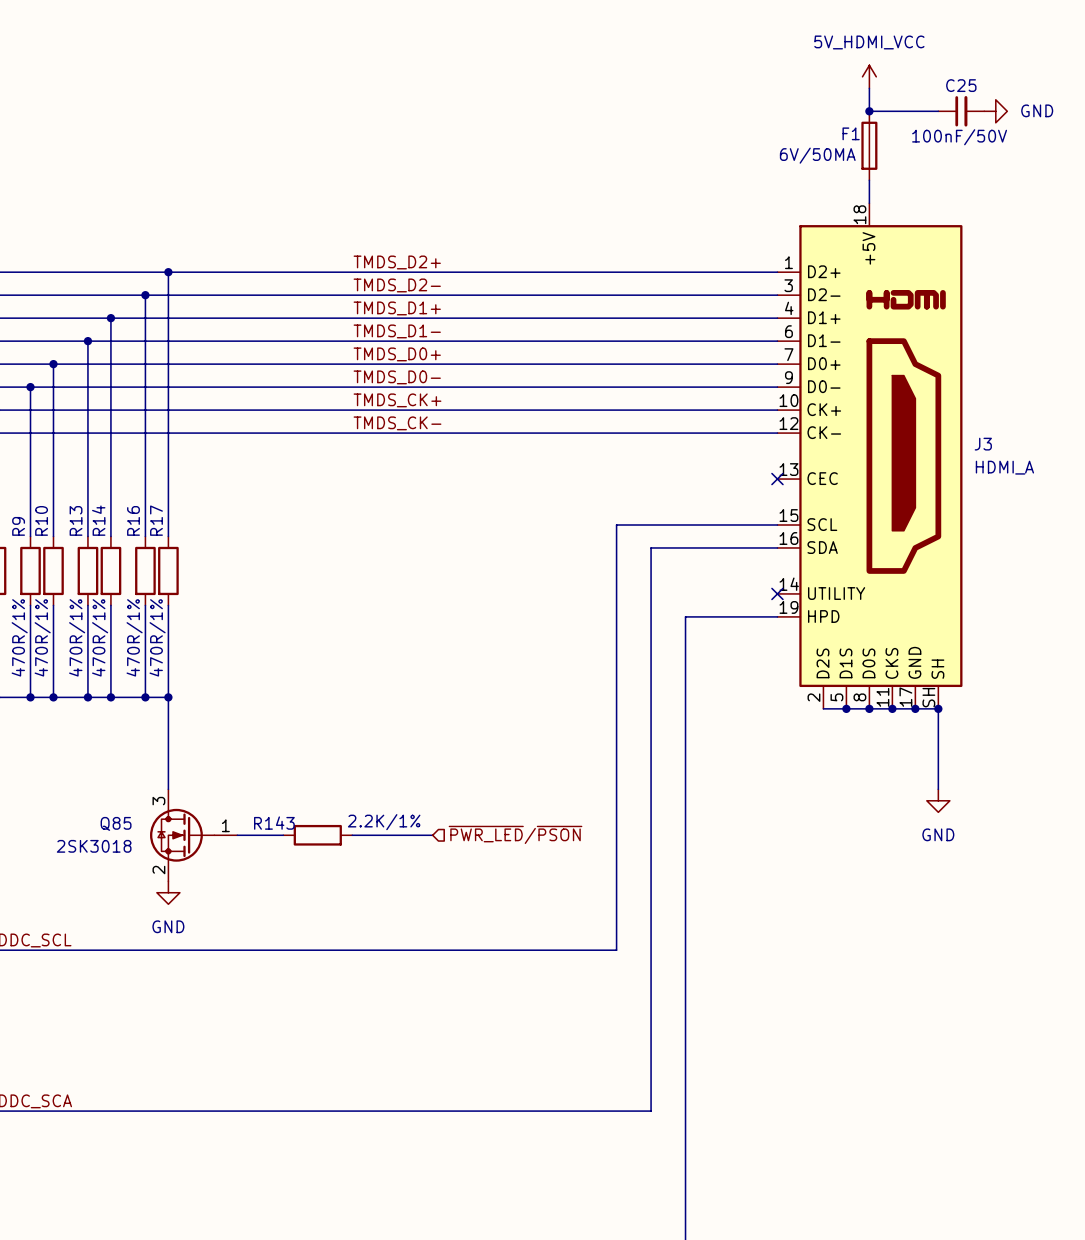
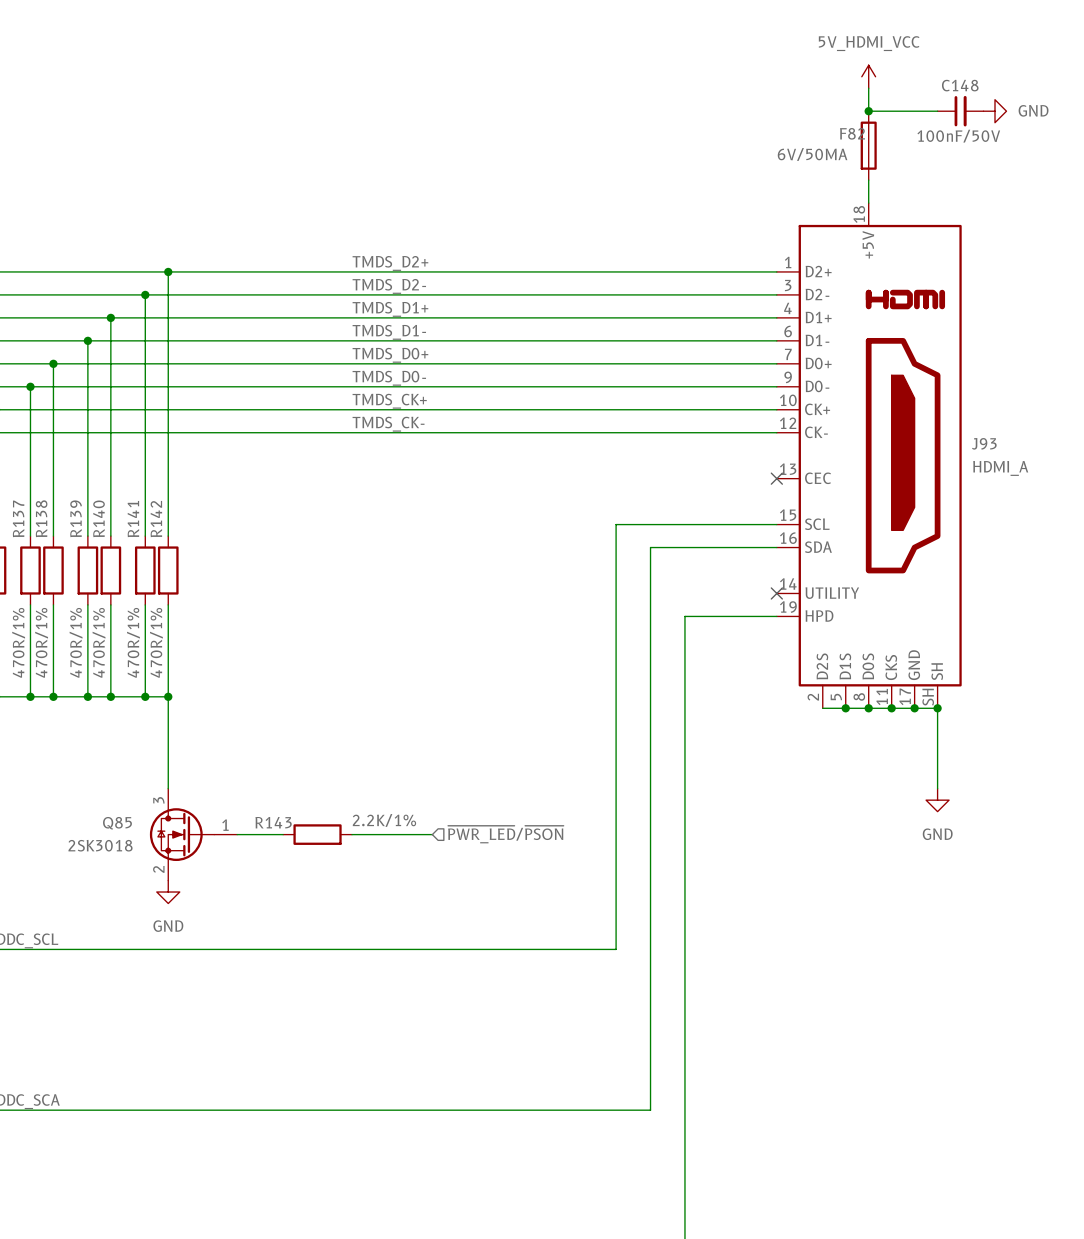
C25 name: C25 (961, 85) -> C148 (960, 85)
F1 name: F1 (851, 133) -> F82 (852, 133)
J3 name: J3 (983, 444) -> J93 (984, 443)
R10 name: R10 (41, 520) -> R138 (41, 518)
R13 name: R13 (76, 520) -> R139 (76, 518)
R14 name: R14 (98, 520) -> R140 (99, 518)
R16 name: R16 (133, 520) -> R141 (133, 519)
R17 name: R17 (156, 520) -> R142 (156, 519)
R9 name: R9 (18, 526) -> R137 (18, 518)

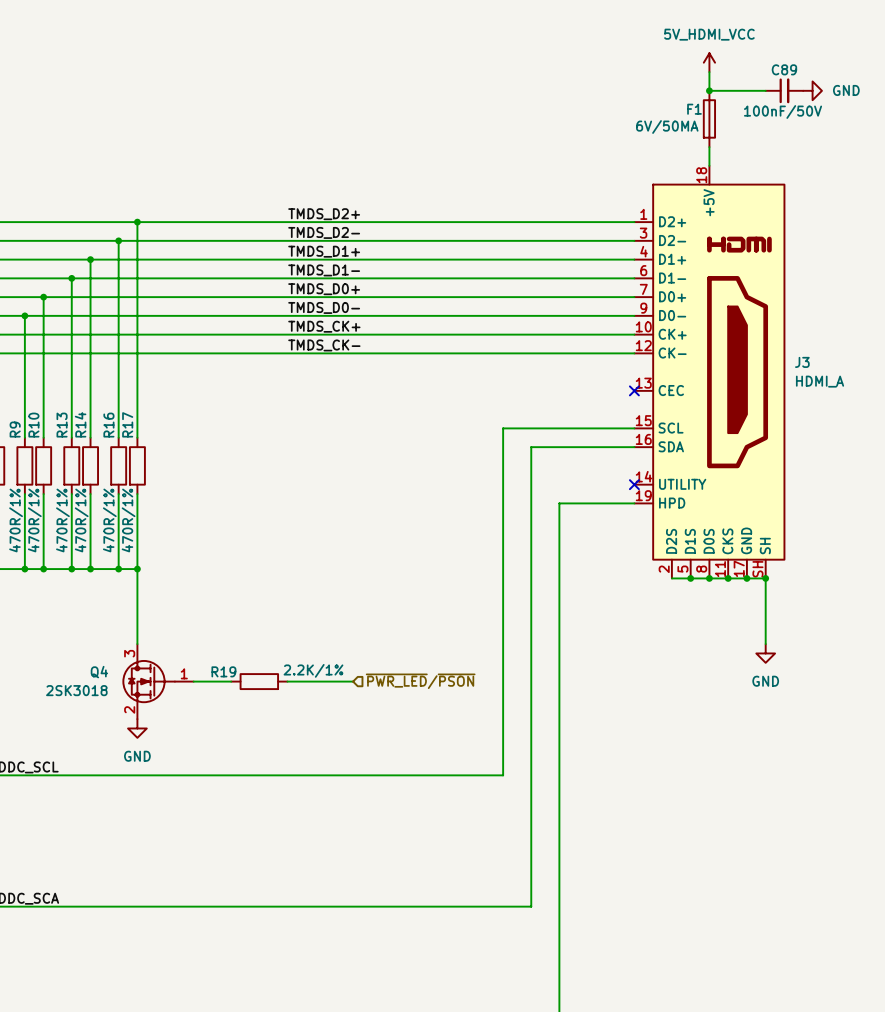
C148 name: C148 (960, 85) -> C89 (784, 69)
F82 name: F82 (852, 133) -> F1 (694, 109)
J93 name: J93 (984, 443) -> J3 (802, 362)
R137 name: R137 (18, 518) -> R9 (15, 429)
R138 name: R138 (41, 518) -> R10 (33, 425)
R139 name: R139 (76, 518) -> R13 (62, 425)
R140 name: R140 (99, 518) -> R14 (80, 424)
R141 name: R141 (133, 519) -> R16 (108, 425)
R142 name: R142 (156, 519) -> R17 (127, 424)
R143 name: R143 (273, 822) -> R19 (223, 671)
Q85 name: Q85 (117, 823) -> Q4 (99, 672)

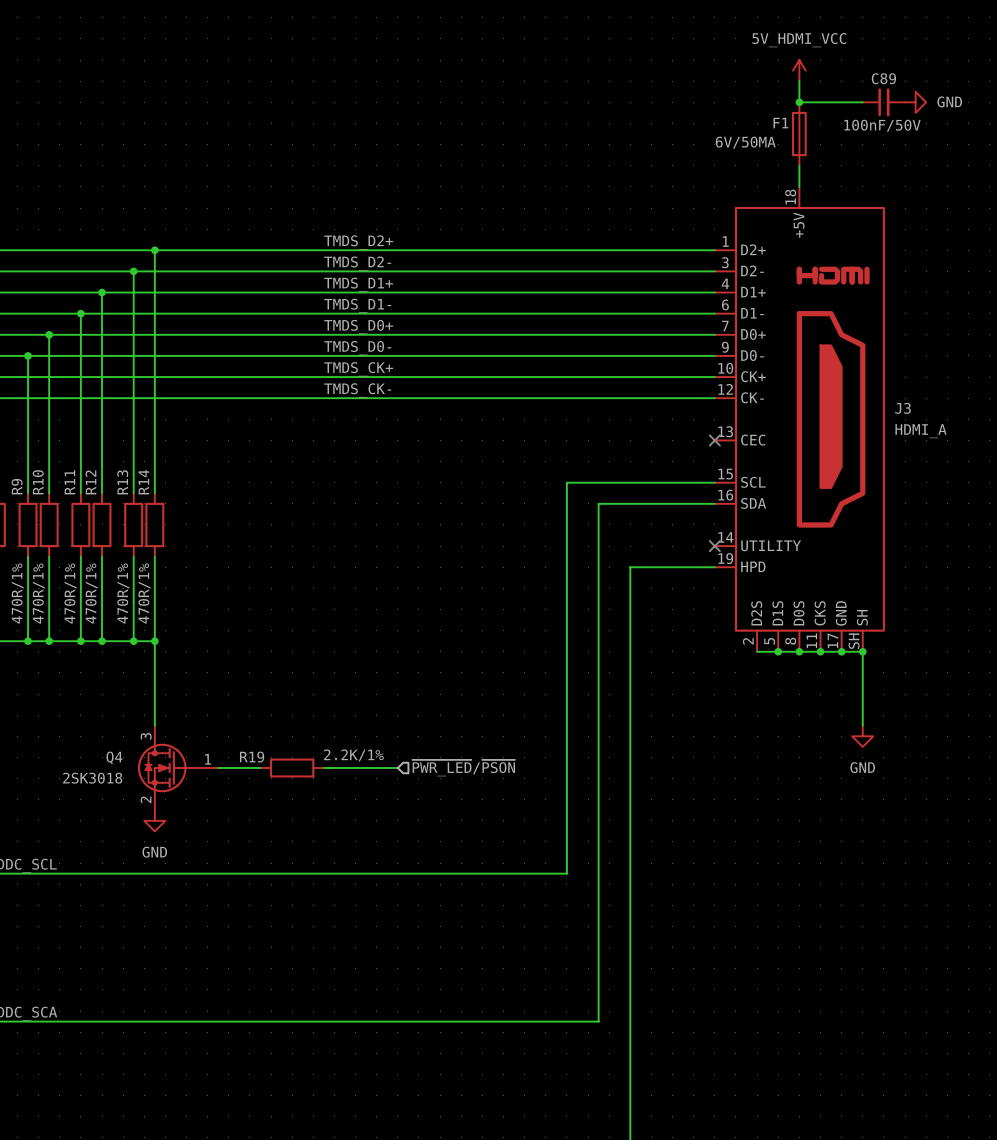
R14 name: R14 (80, 424) -> R12 (90, 482)
R17 name: R17 (127, 424) -> R14 (143, 482)
R13 name: R13 (62, 425) -> R11 (69, 482)
R16 name: R16 (108, 425) -> R13 (122, 482)

